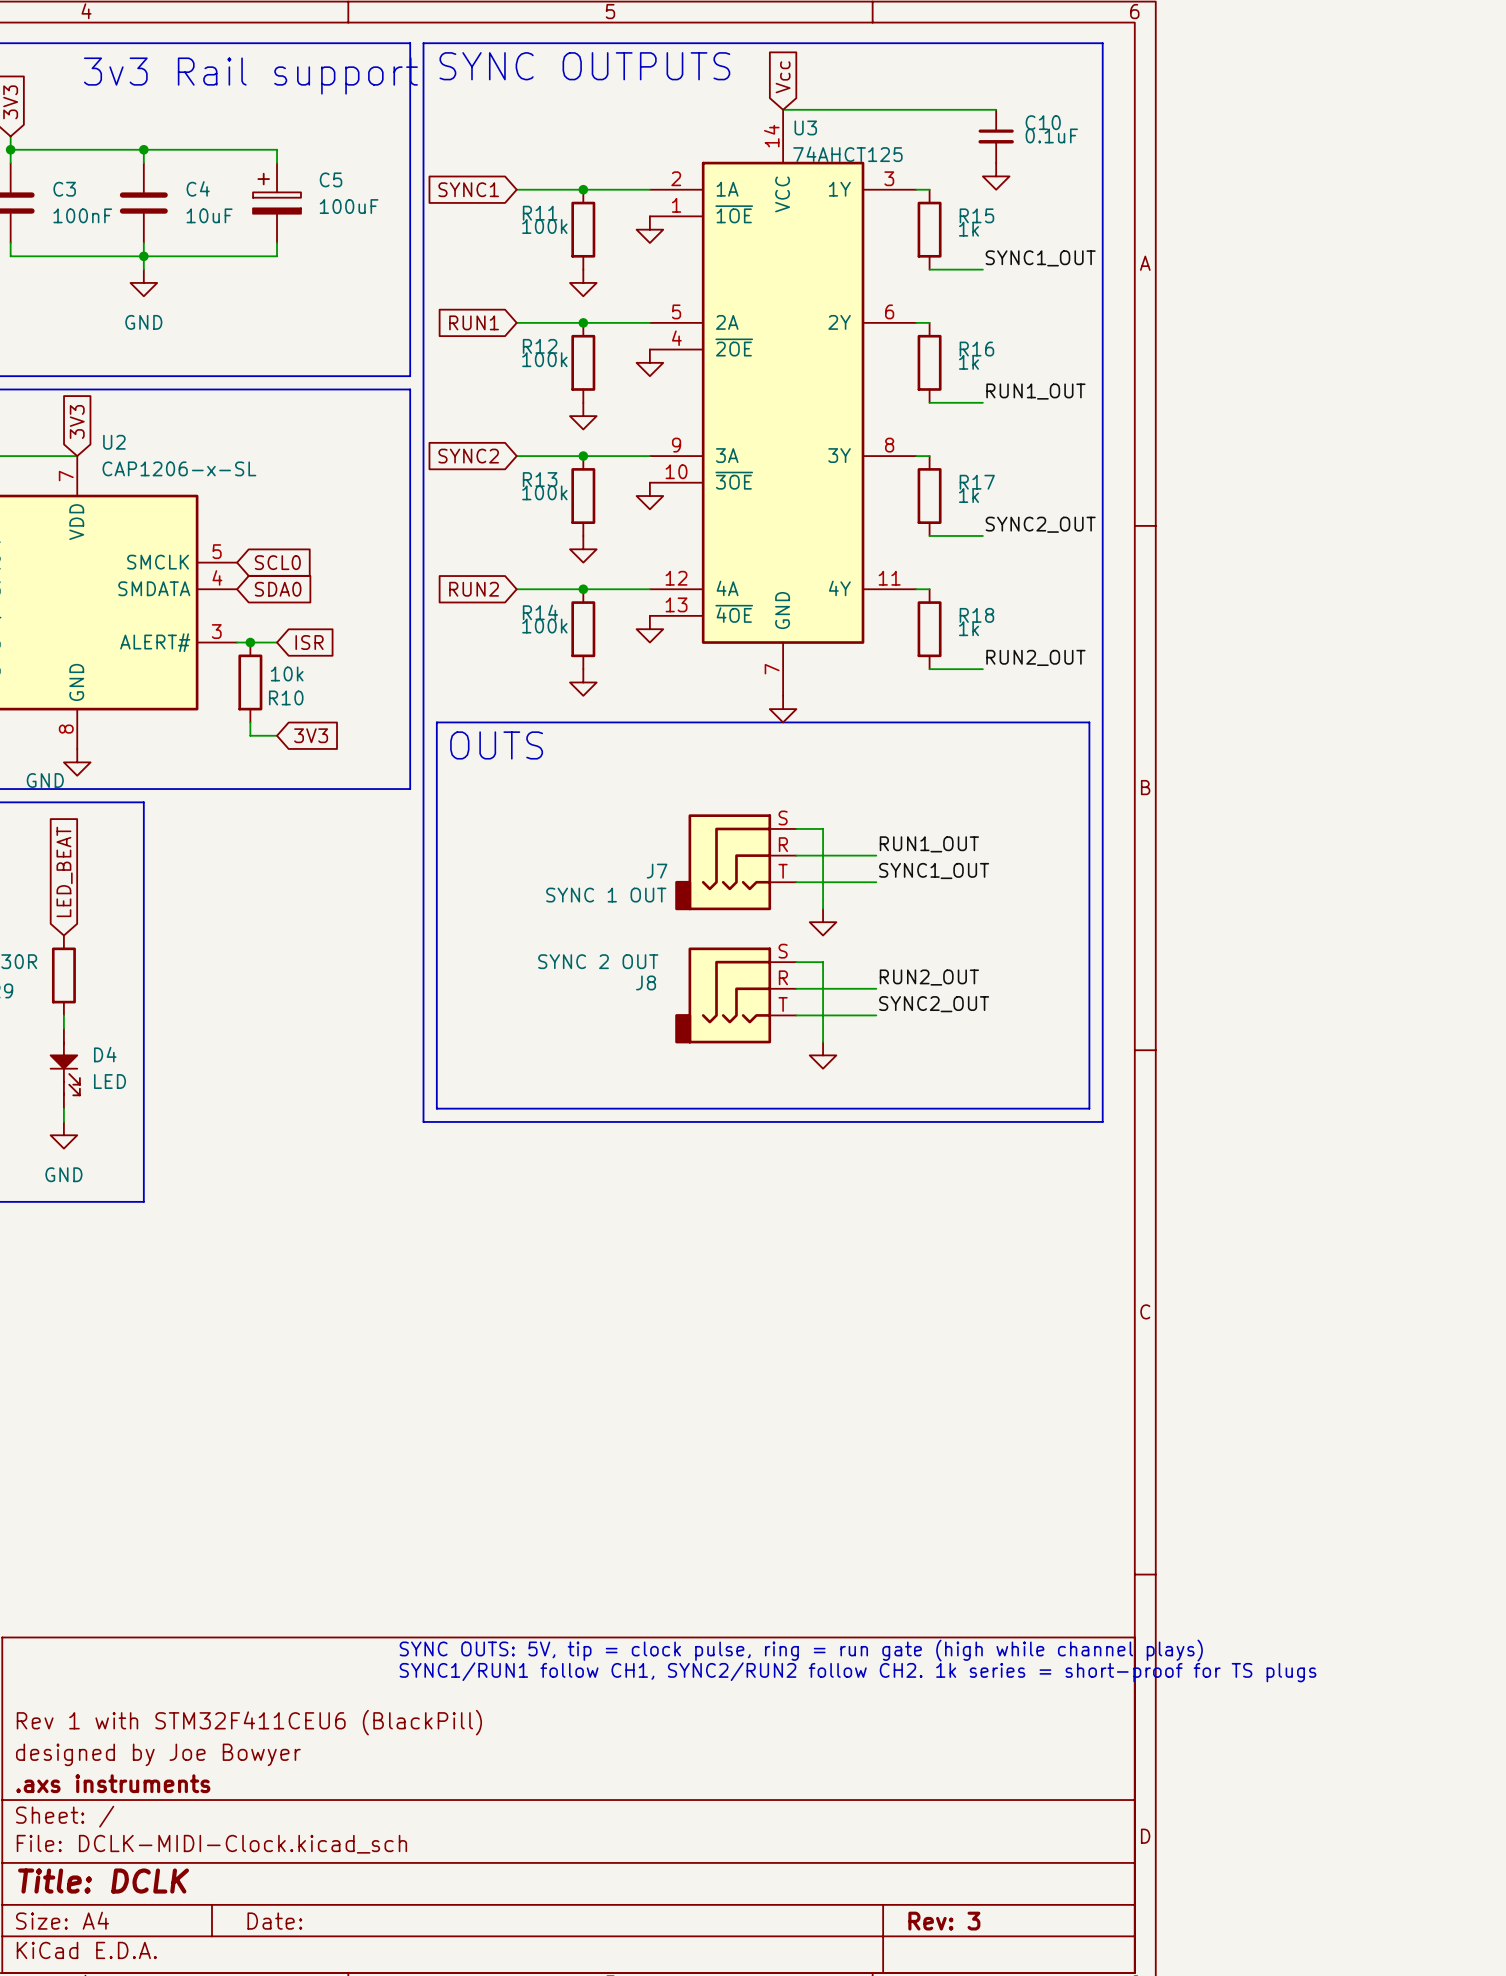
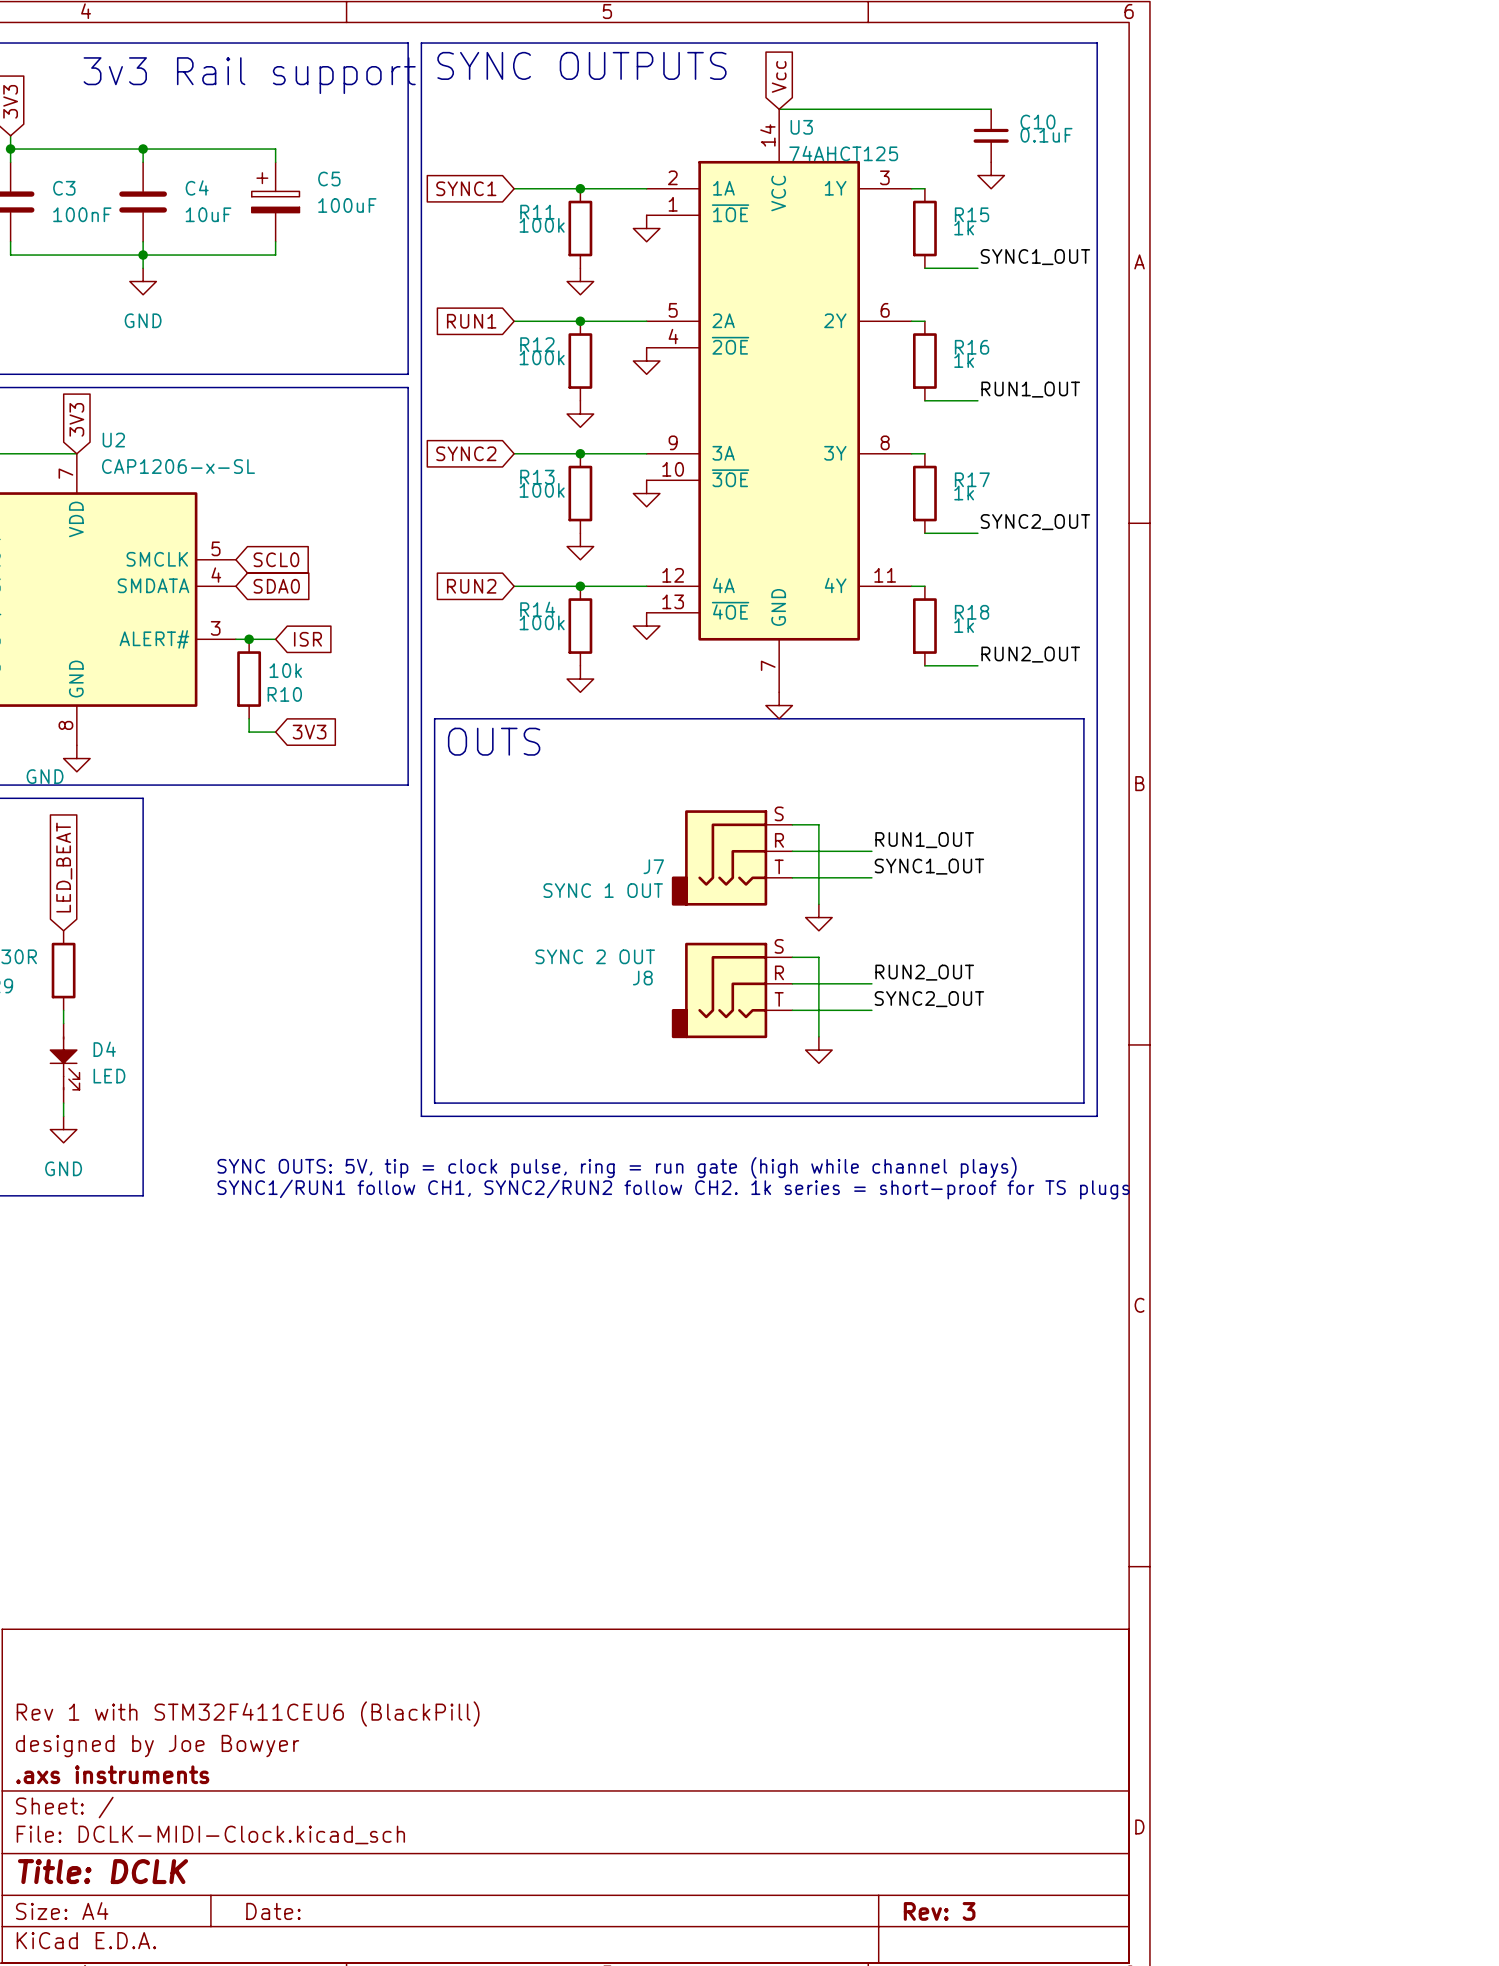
text: none -> SYNC OUTS: 5V, tip = clock pulse, ring = run gate (high while channel plays) (617, 1167)
text: none -> SYNC1/RUN1 follow CH1, SYNC2/RUN2 follow CH2. 1k series = short-proof for TS plugs (673, 1189)
text: SYNC OUTS: 5V, tip = clock pulse, ring = run gate (high while channel plays) (801, 1650) -> none
text: SYNC1/RUN1 follow CH1, SYNC2/RUN2 follow CH2. 1k series = short-proof for TS plugs (858, 1672) -> none

